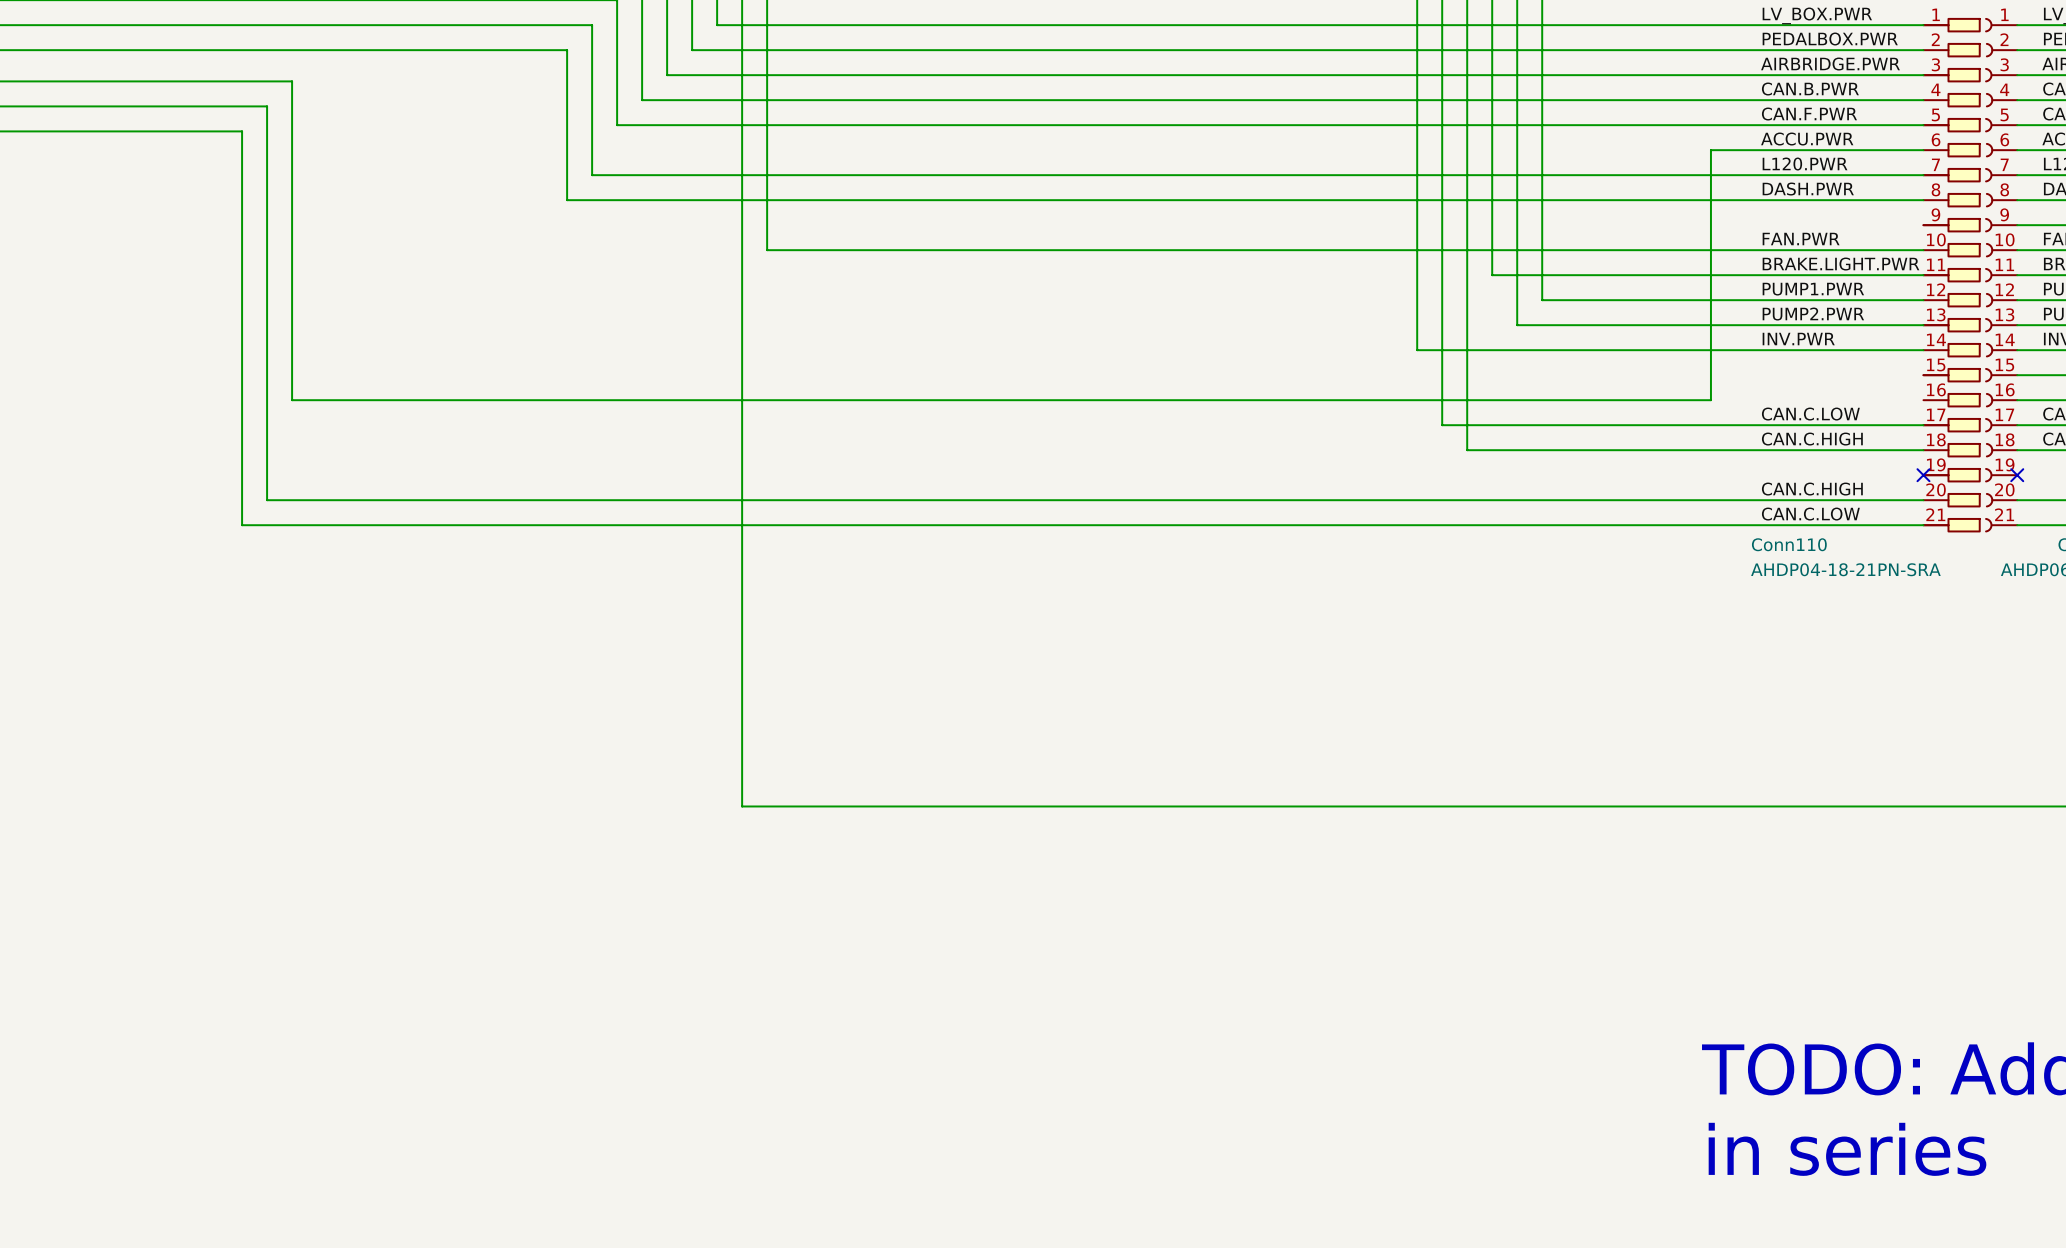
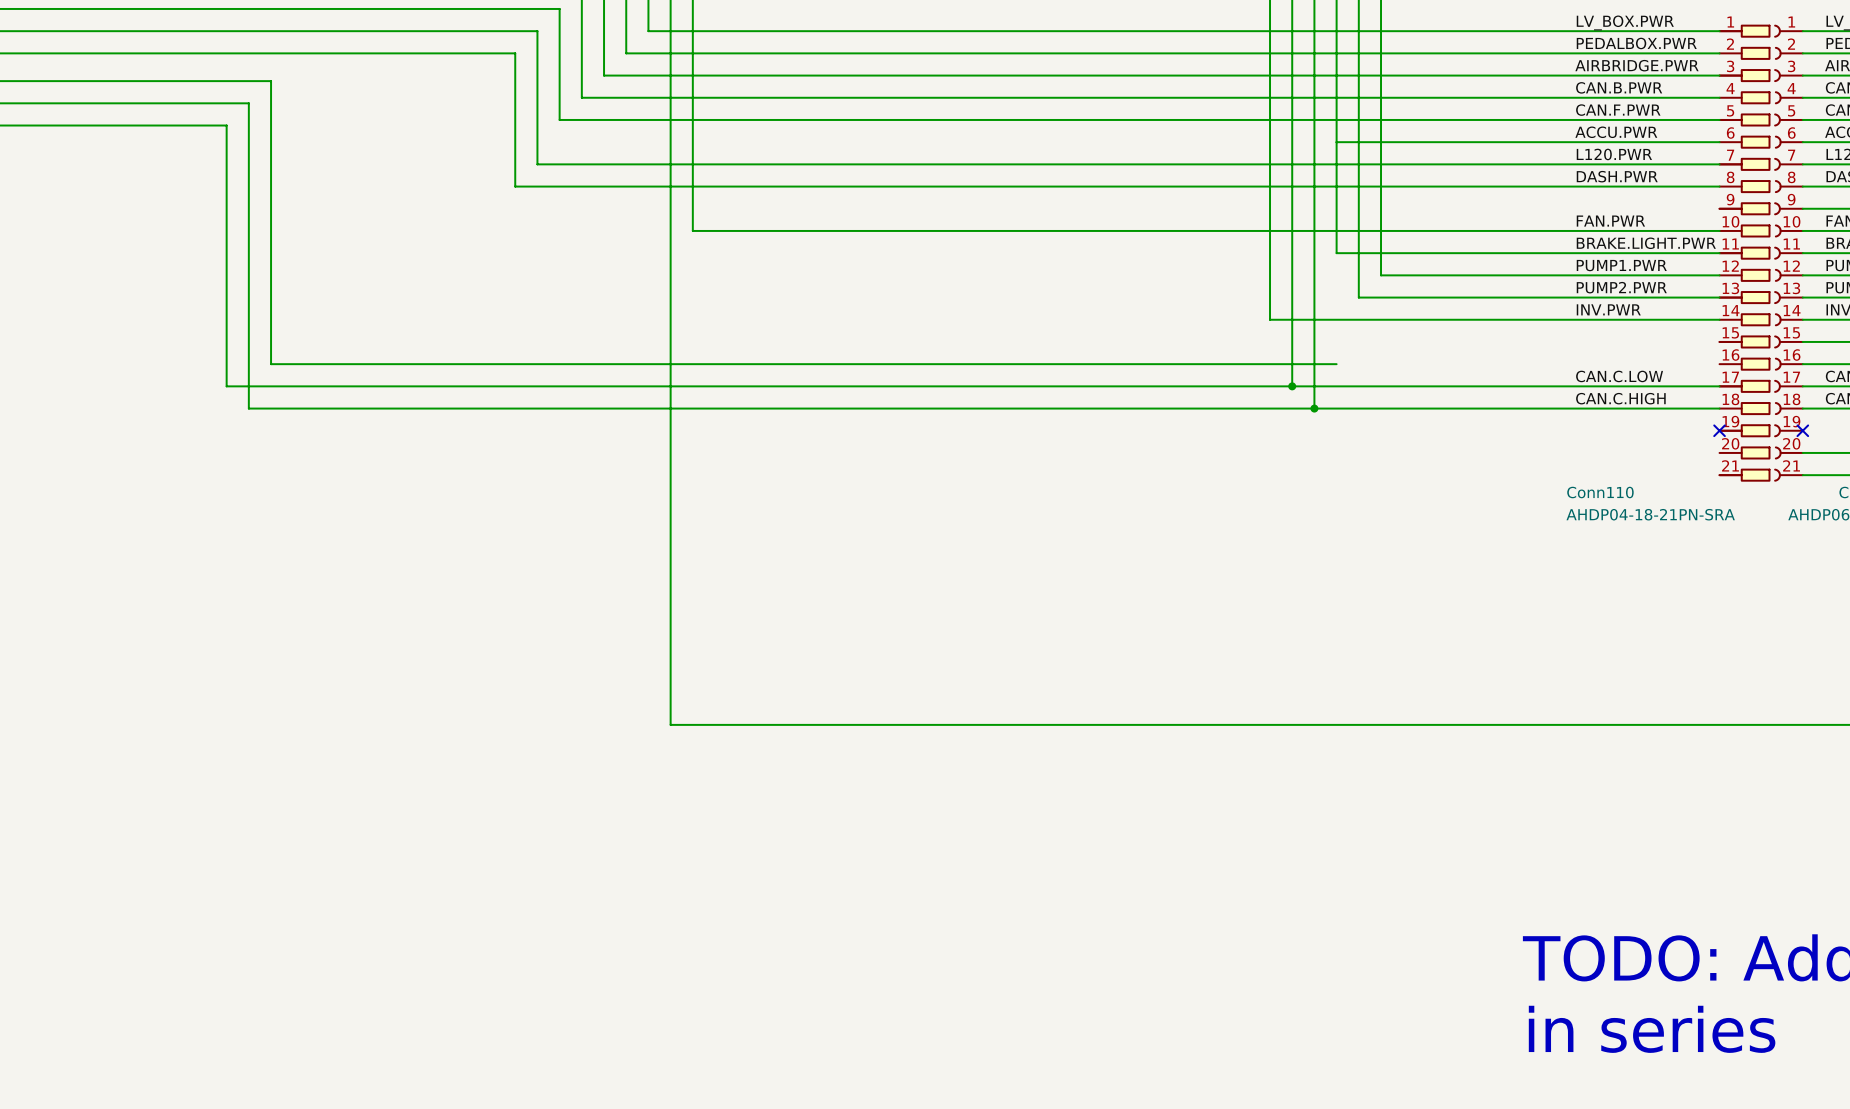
wire: (1710, 150) (1710, 400) (1492, 400) -> (1530, 142) (1336, 142)
wire: (242, 425) (242, 525) (1923, 525) -> (226, 386) (1292, 386)
junction: none -> (1292, 386)
wire: (267, 450) (267, 500) (1923, 500) -> (248, 408) (1314, 408)
junction: none -> (1314, 408)
label: CAN.C.HIGH (1812, 489) -> none
label: CAN.C.LOW (1810, 514) -> none

